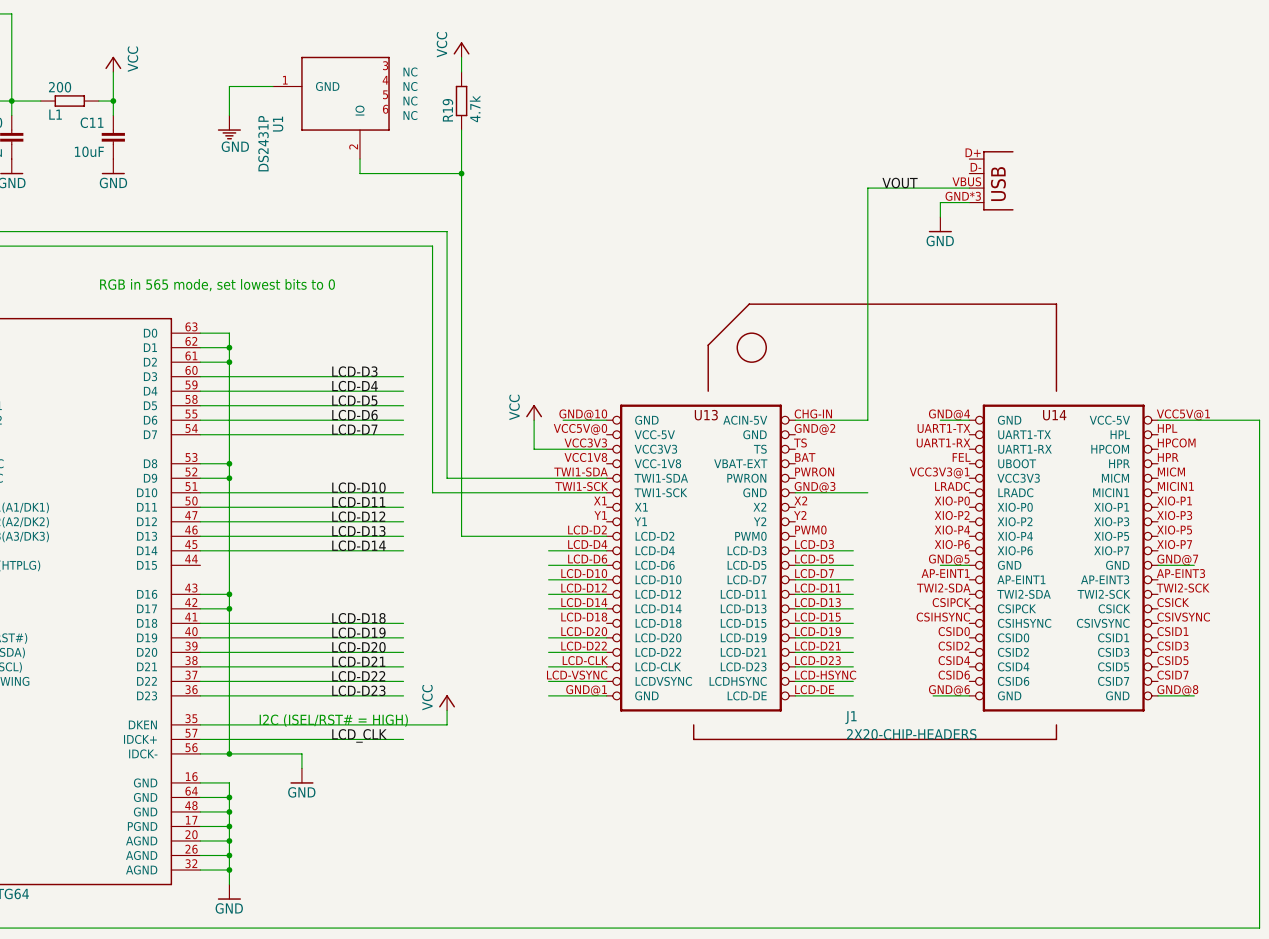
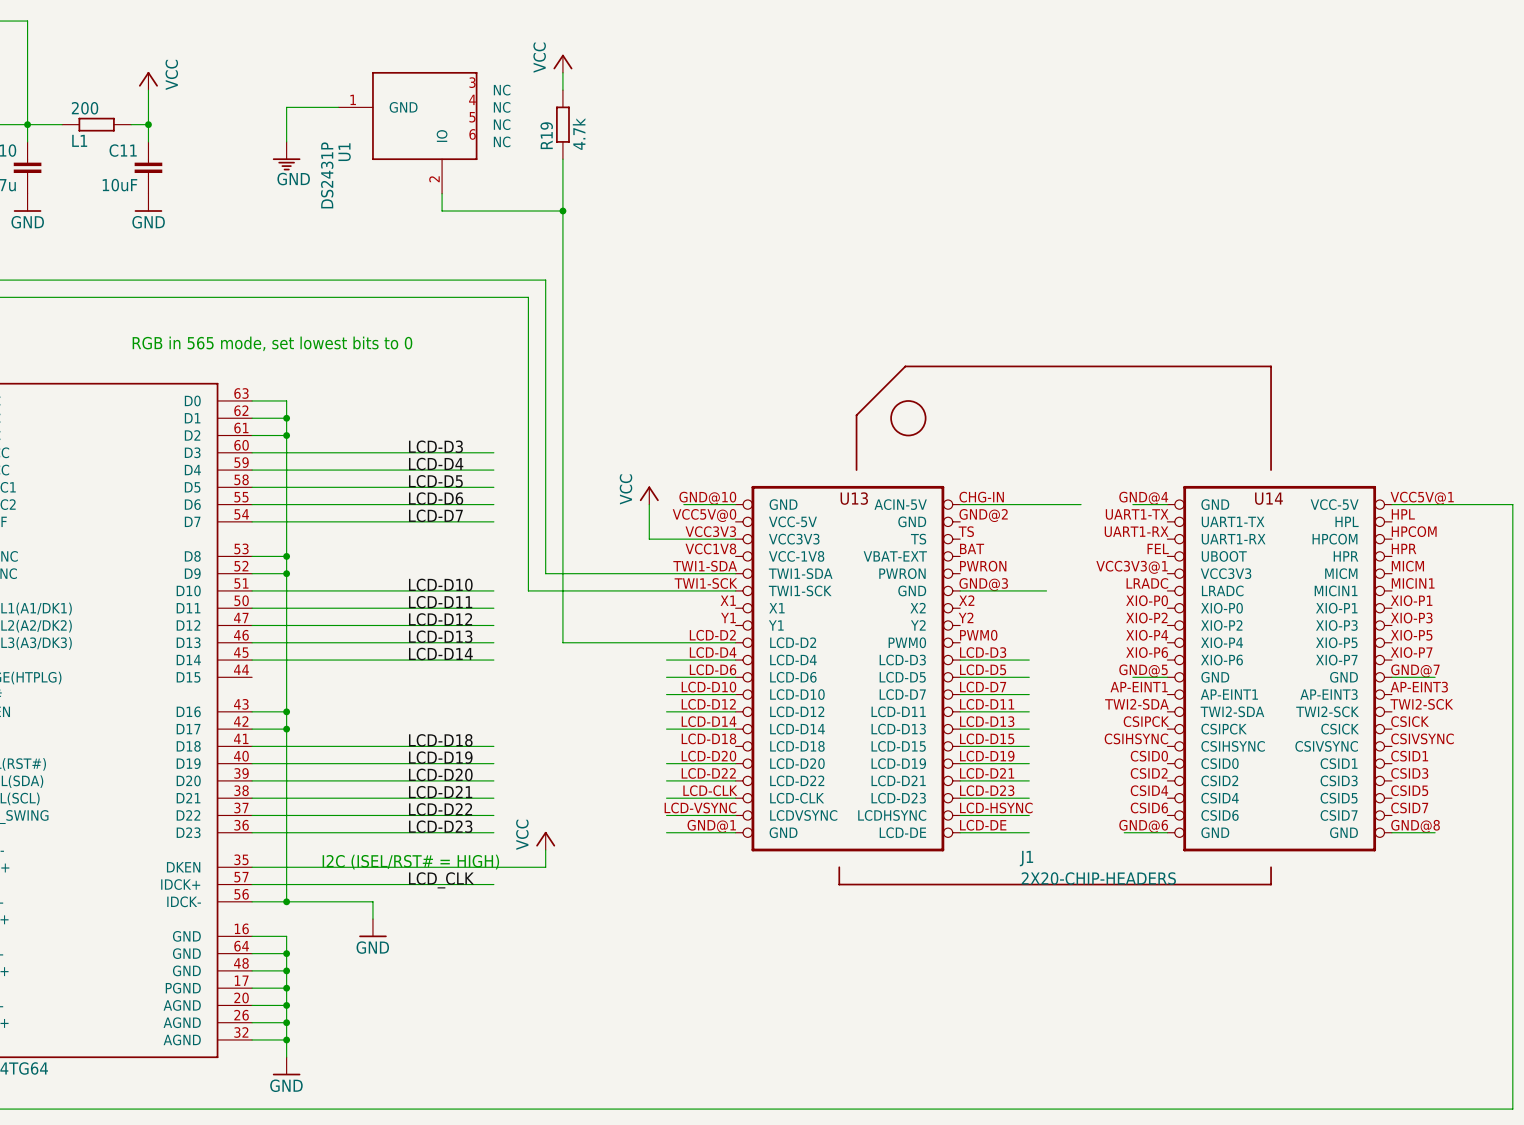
part: (991, 180) -> none
label: VOUT (900, 183) -> none
wire: (969, 188) (867, 188) (867, 420) -> (1081, 504) (1046, 504)
wire: (969, 202) (940, 202) (940, 217) -> none
power symbol: GND (940, 224) -> none

